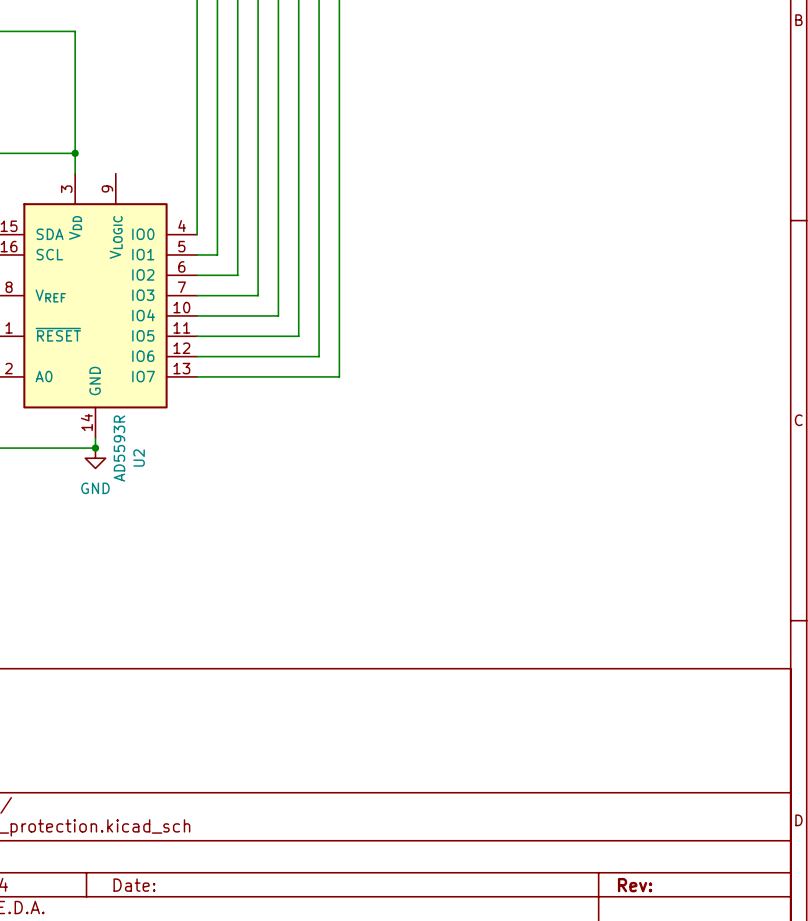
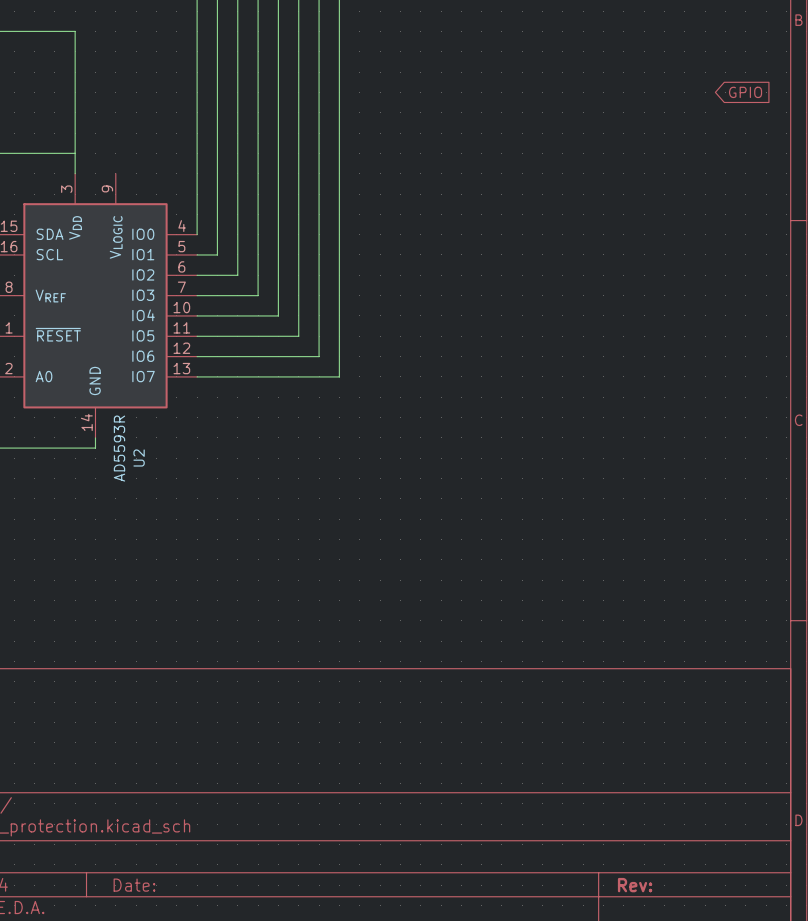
global label: none -> GPIO (745, 92)
junction: (75, 153) -> none
junction: (95, 448) -> none
power symbol: GND (95, 458) -> none

